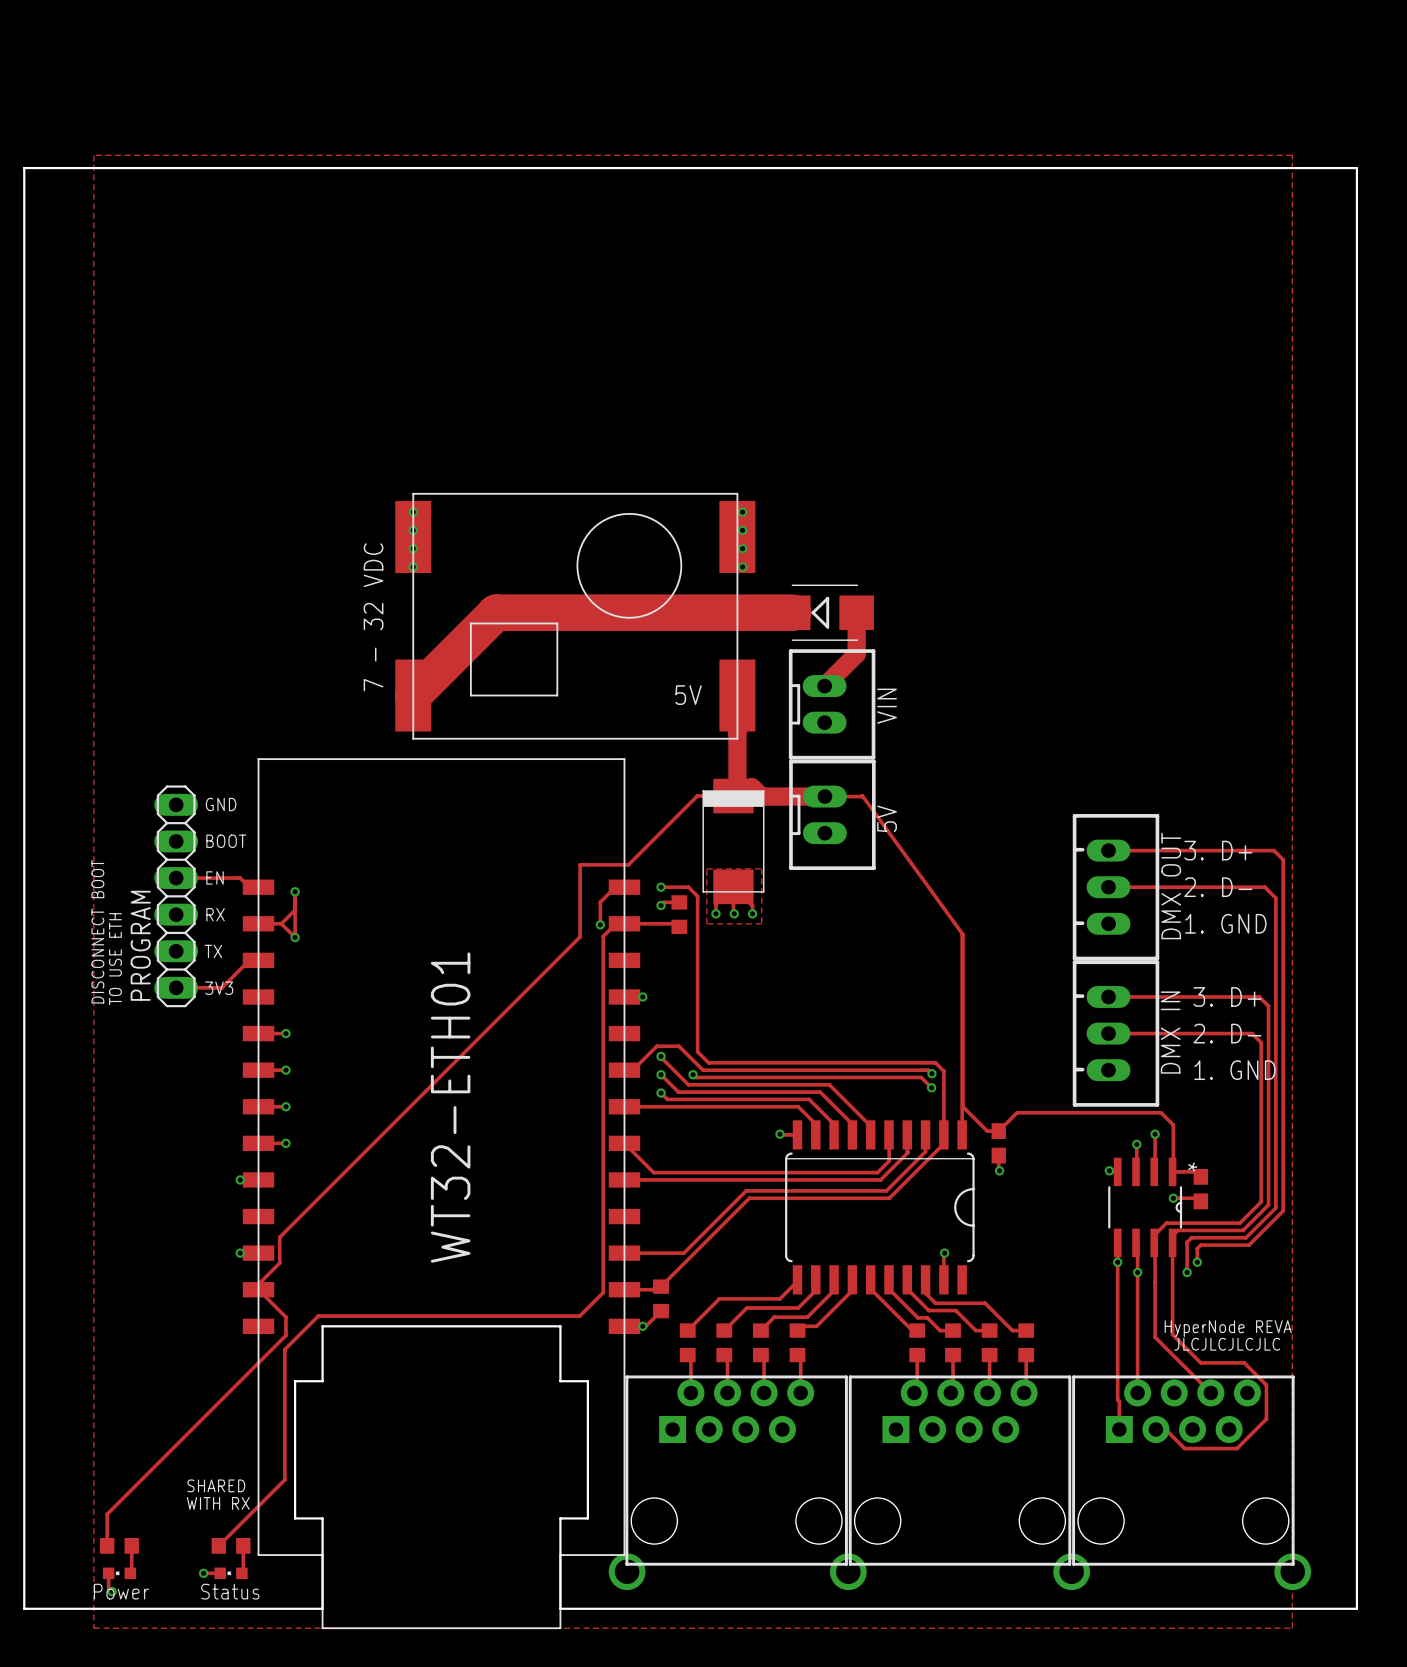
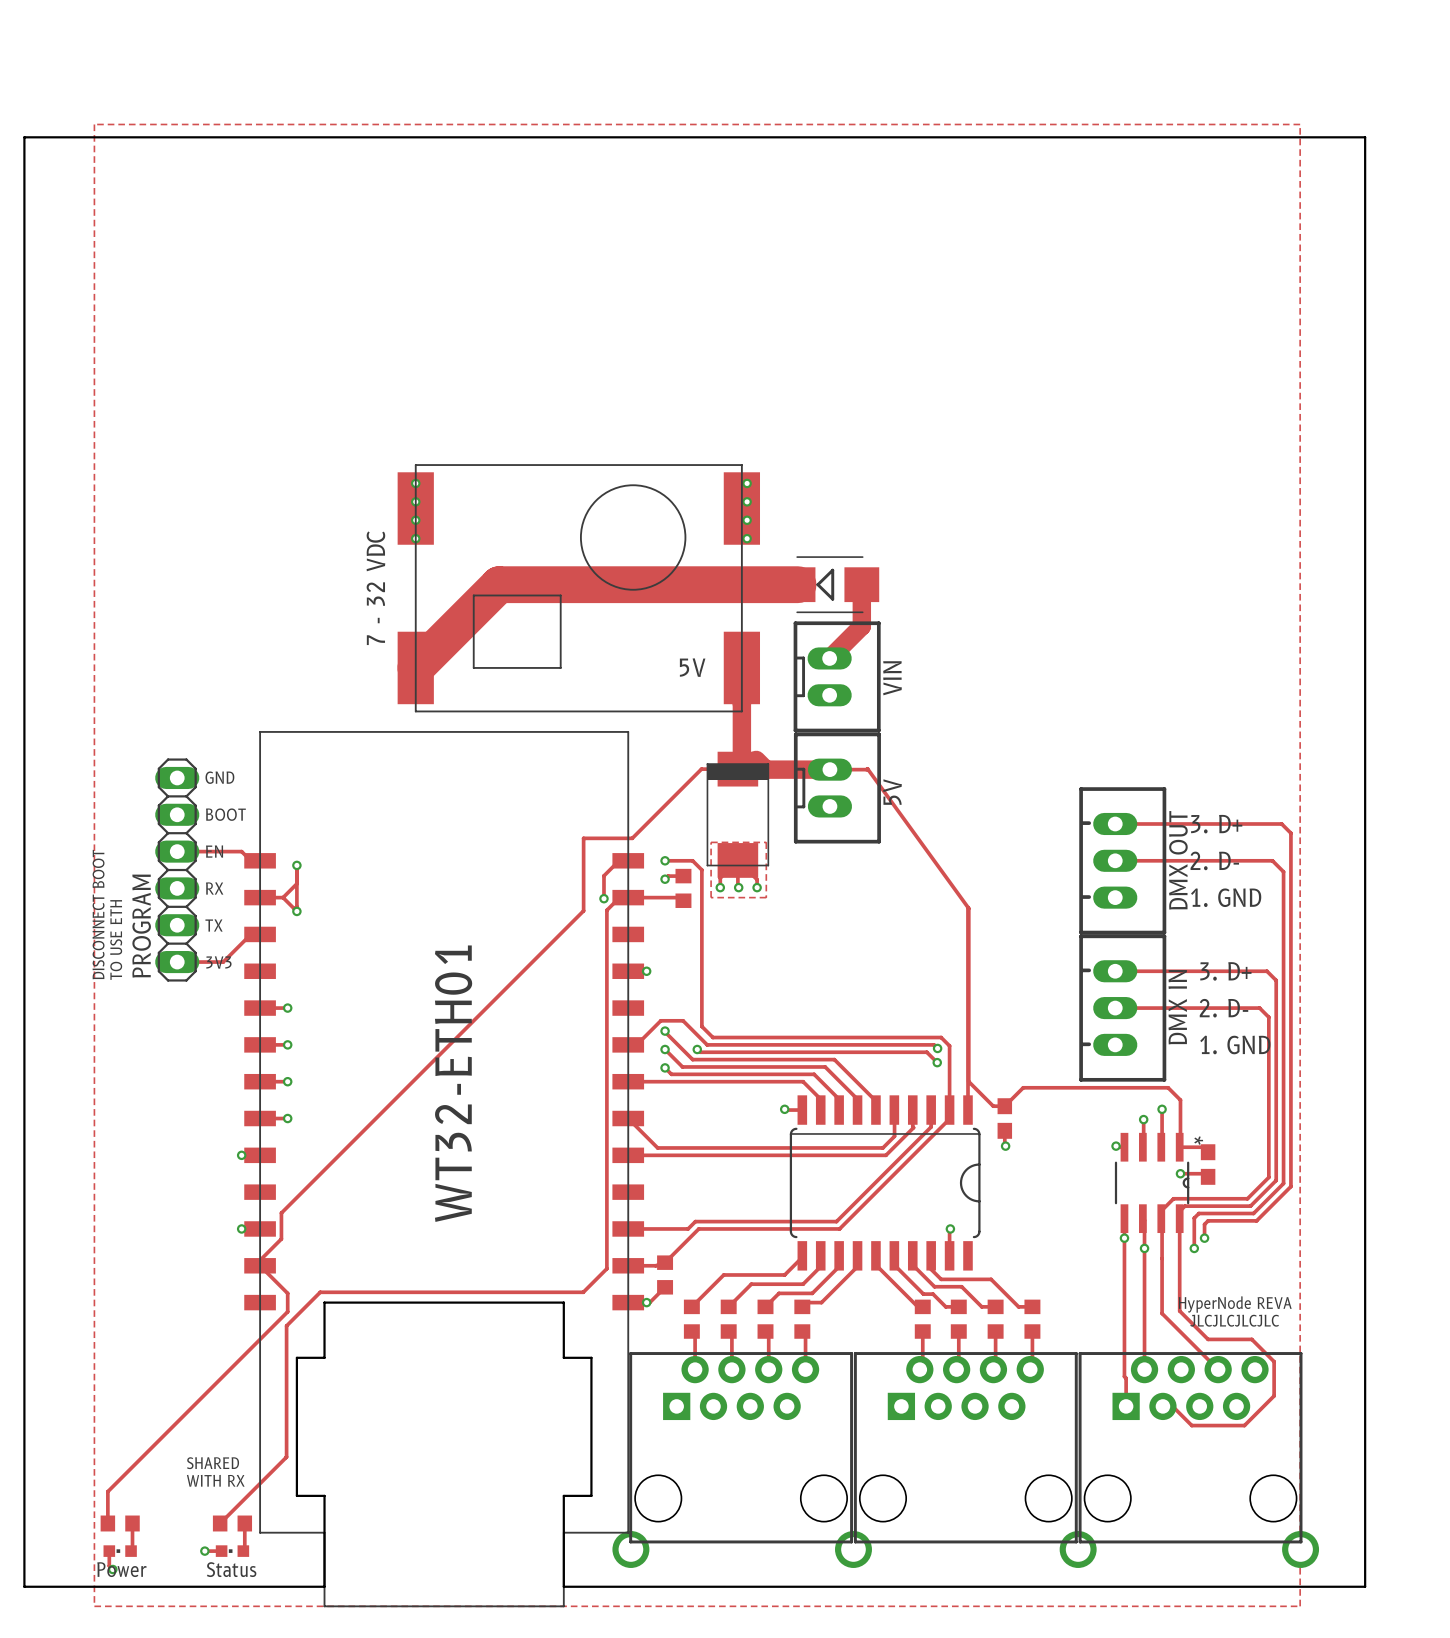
track: (886, 1190) (746, 1190) (691, 1245) -> (891, 1166) (836, 1221) (695, 1221)
track: (889, 1198) (749, 1198) (694, 1253) -> (894, 1173) (839, 1228) (698, 1228)

